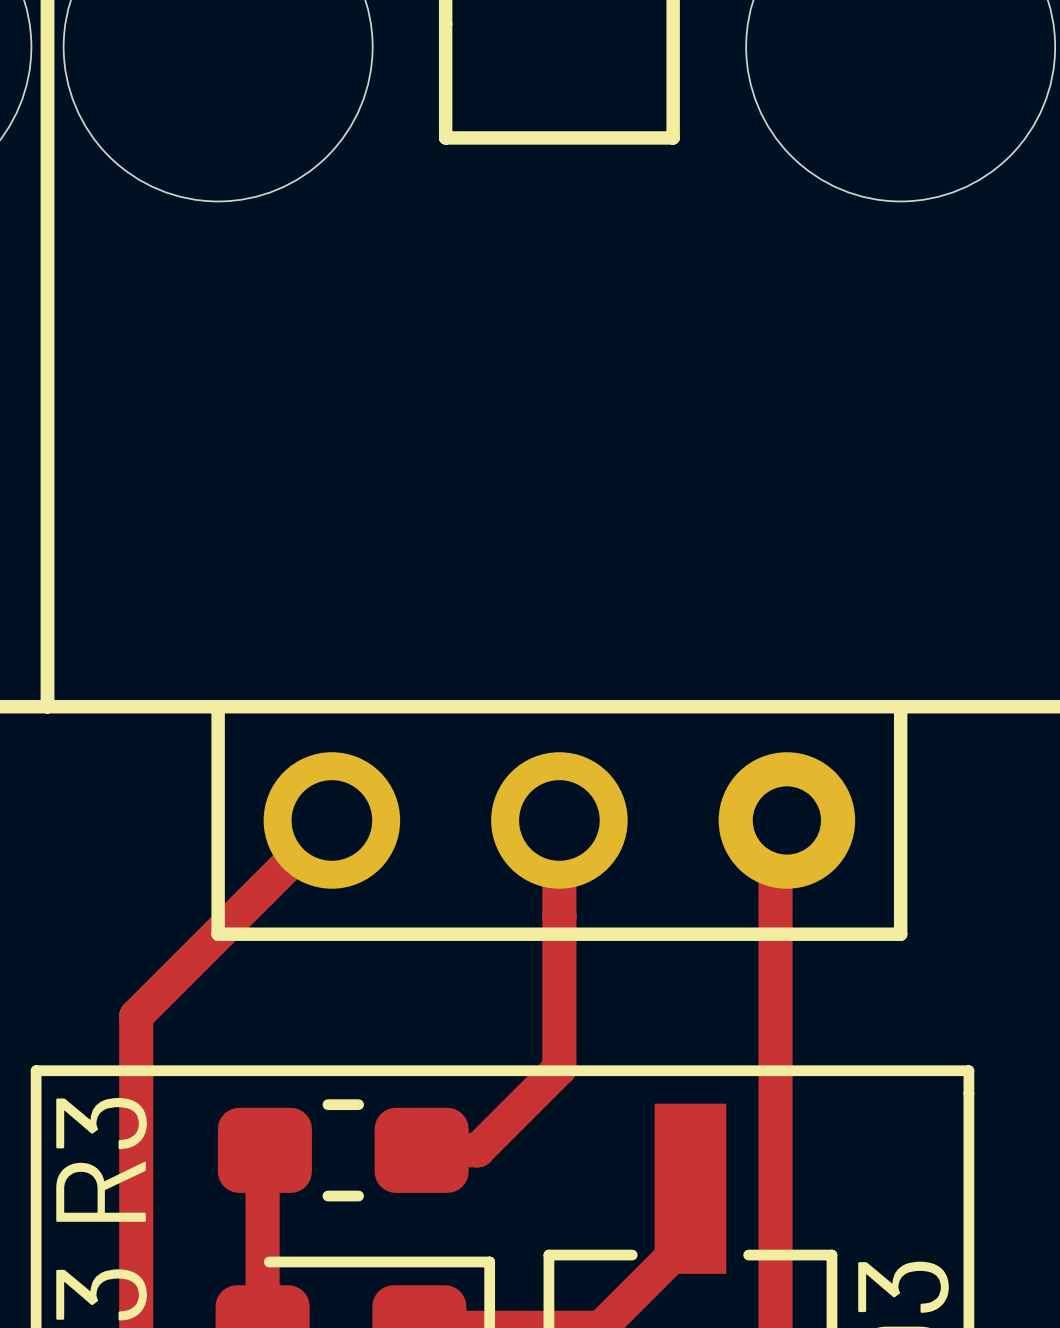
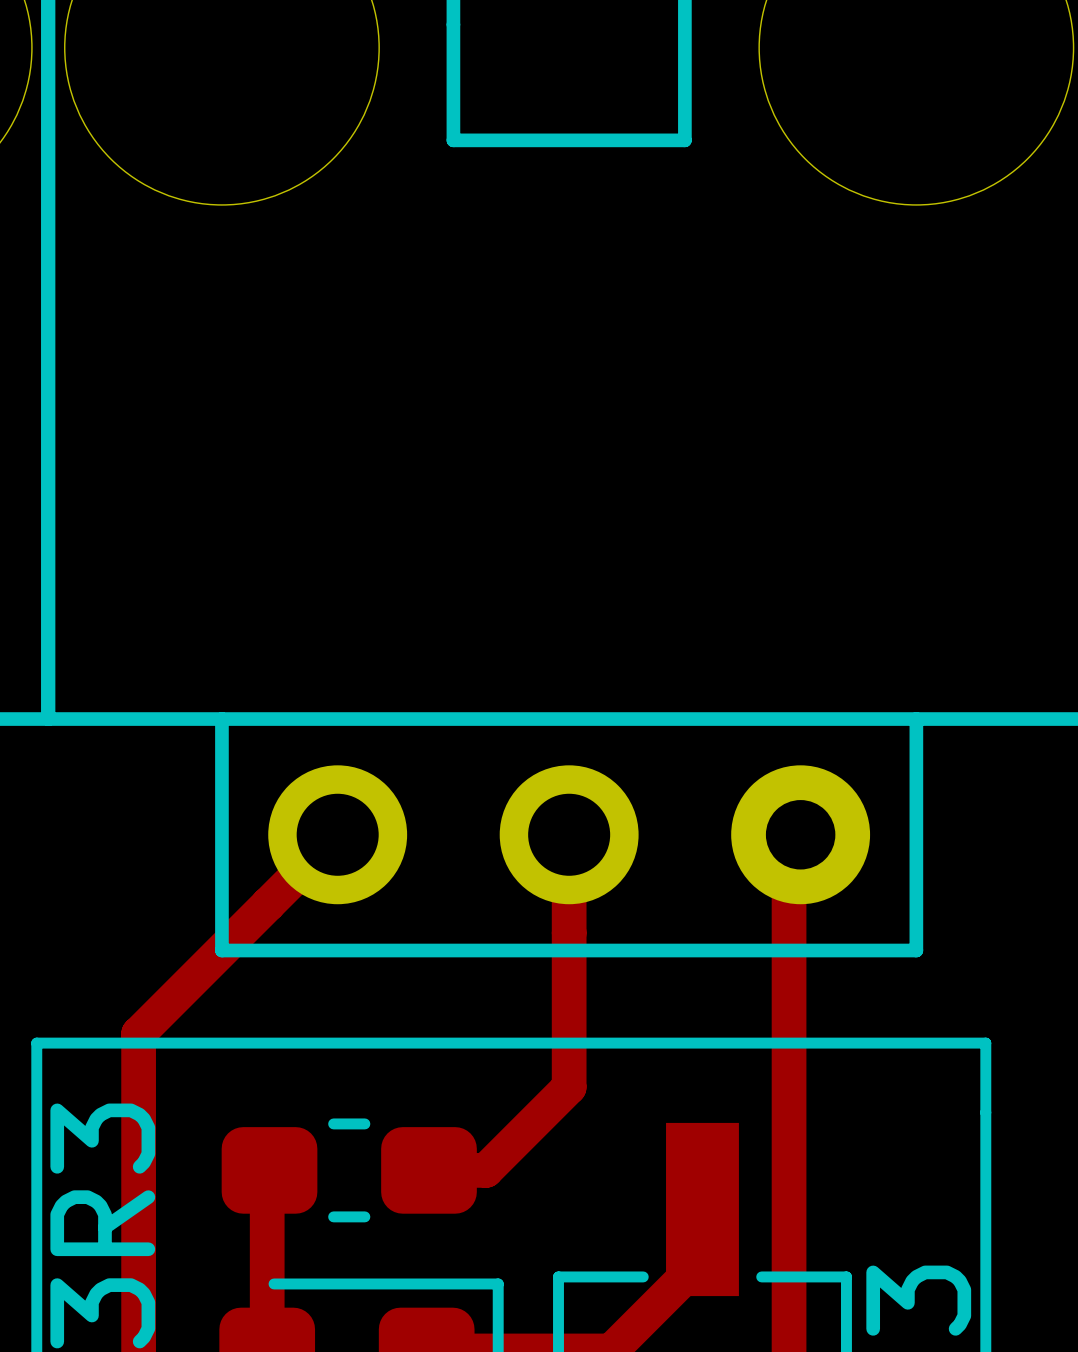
line: (36, 1070) (968, 1070) -> (36, 1089) (36, 1043) (985, 1043) (985, 1089)

